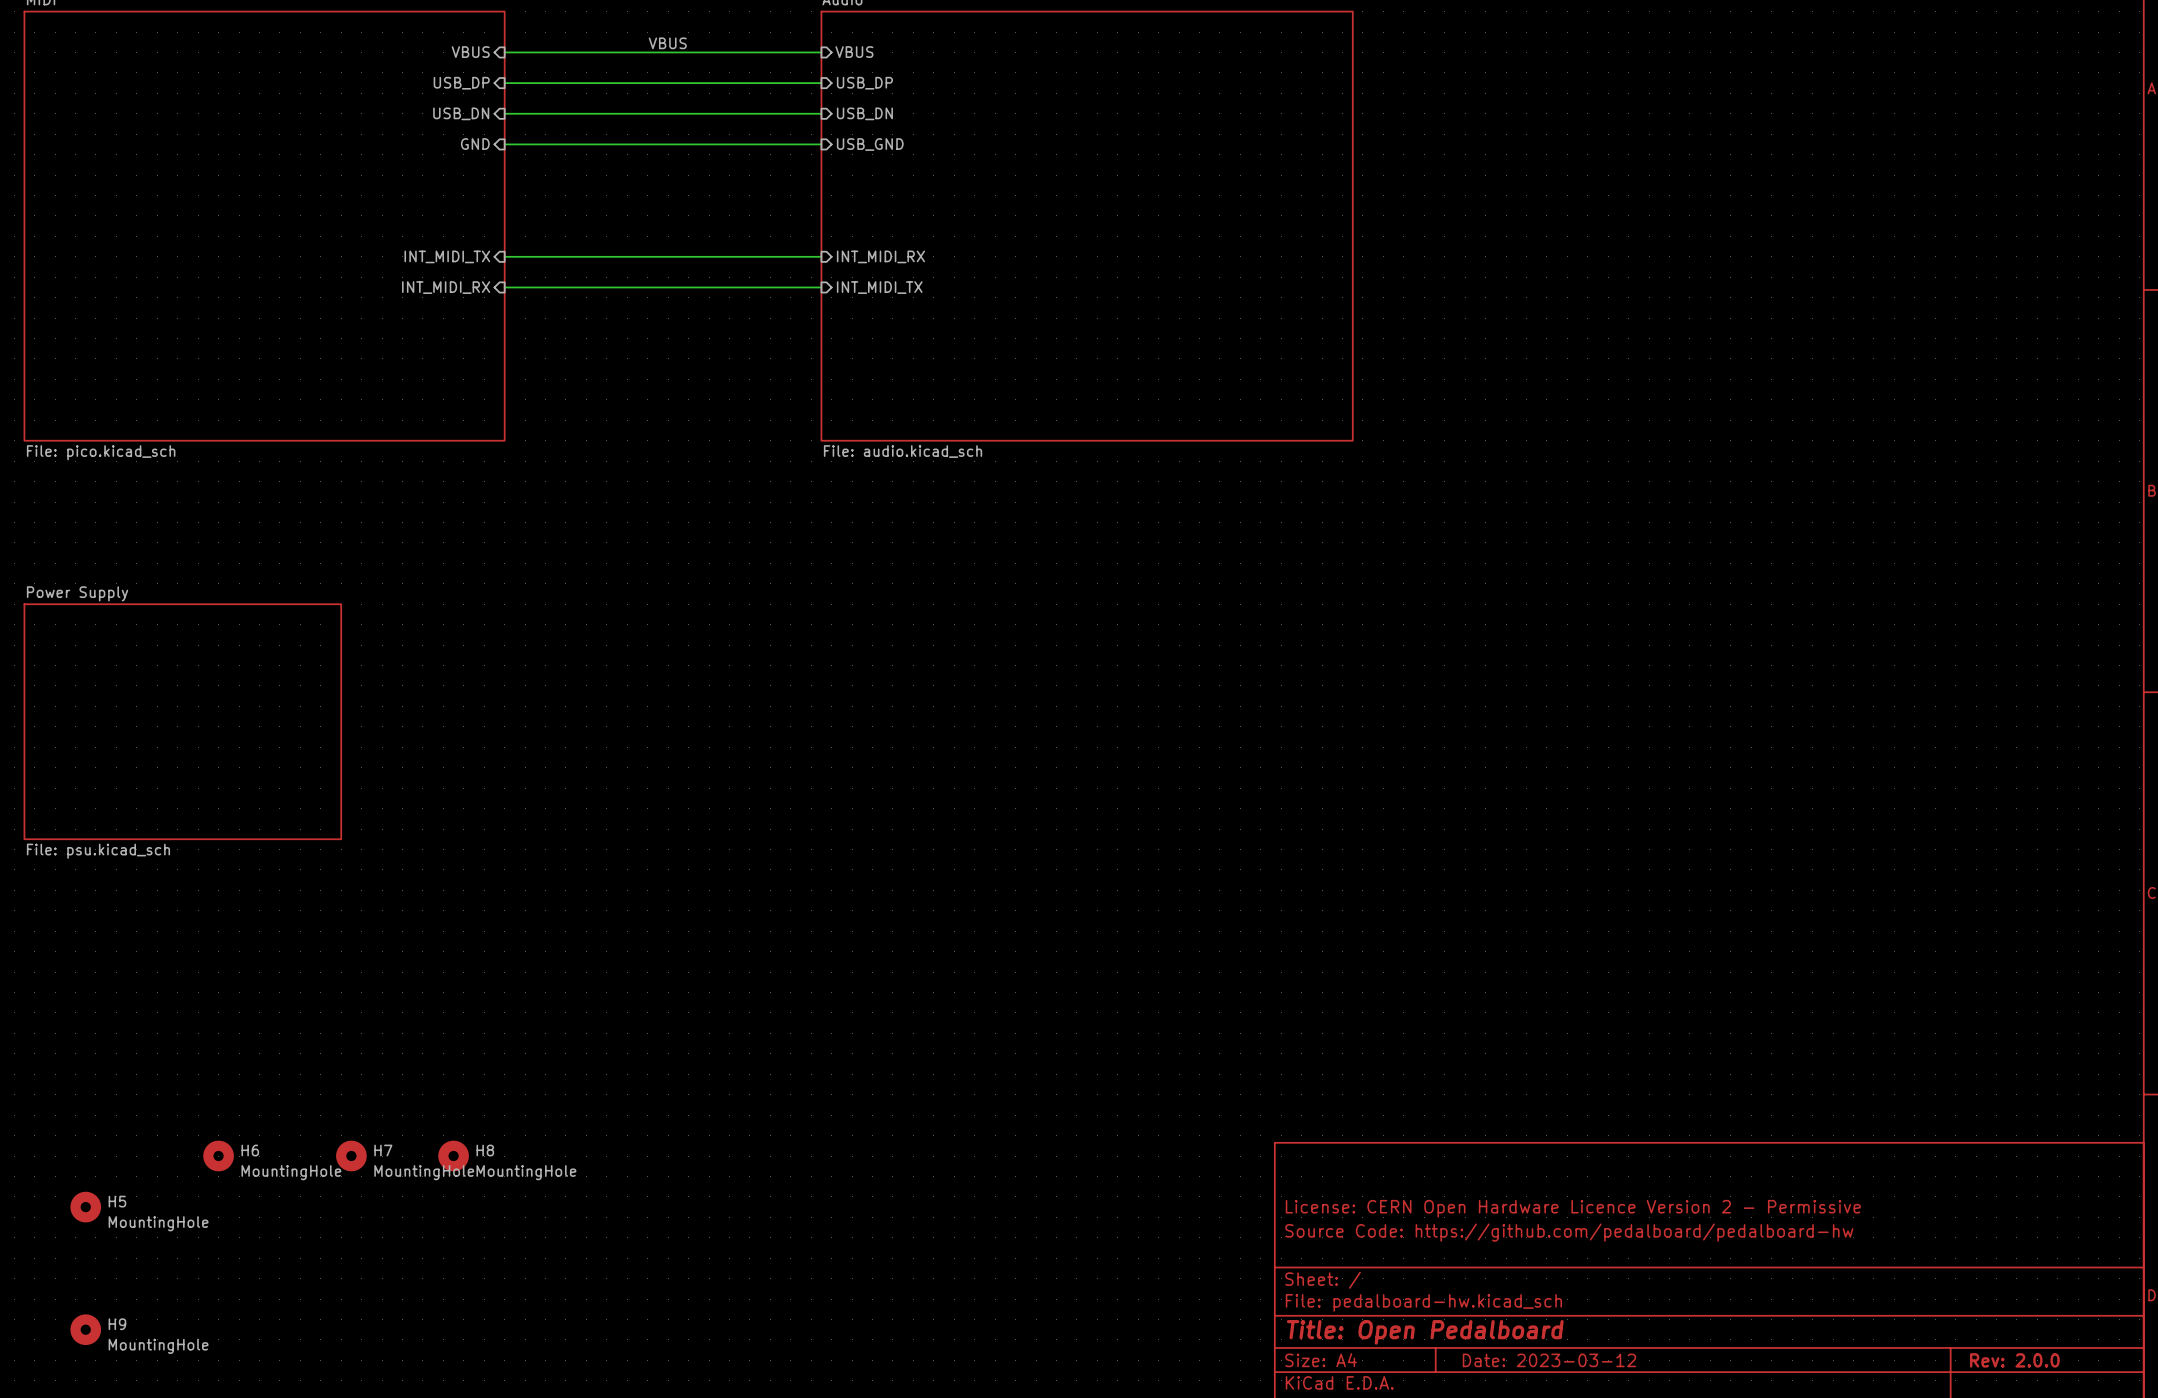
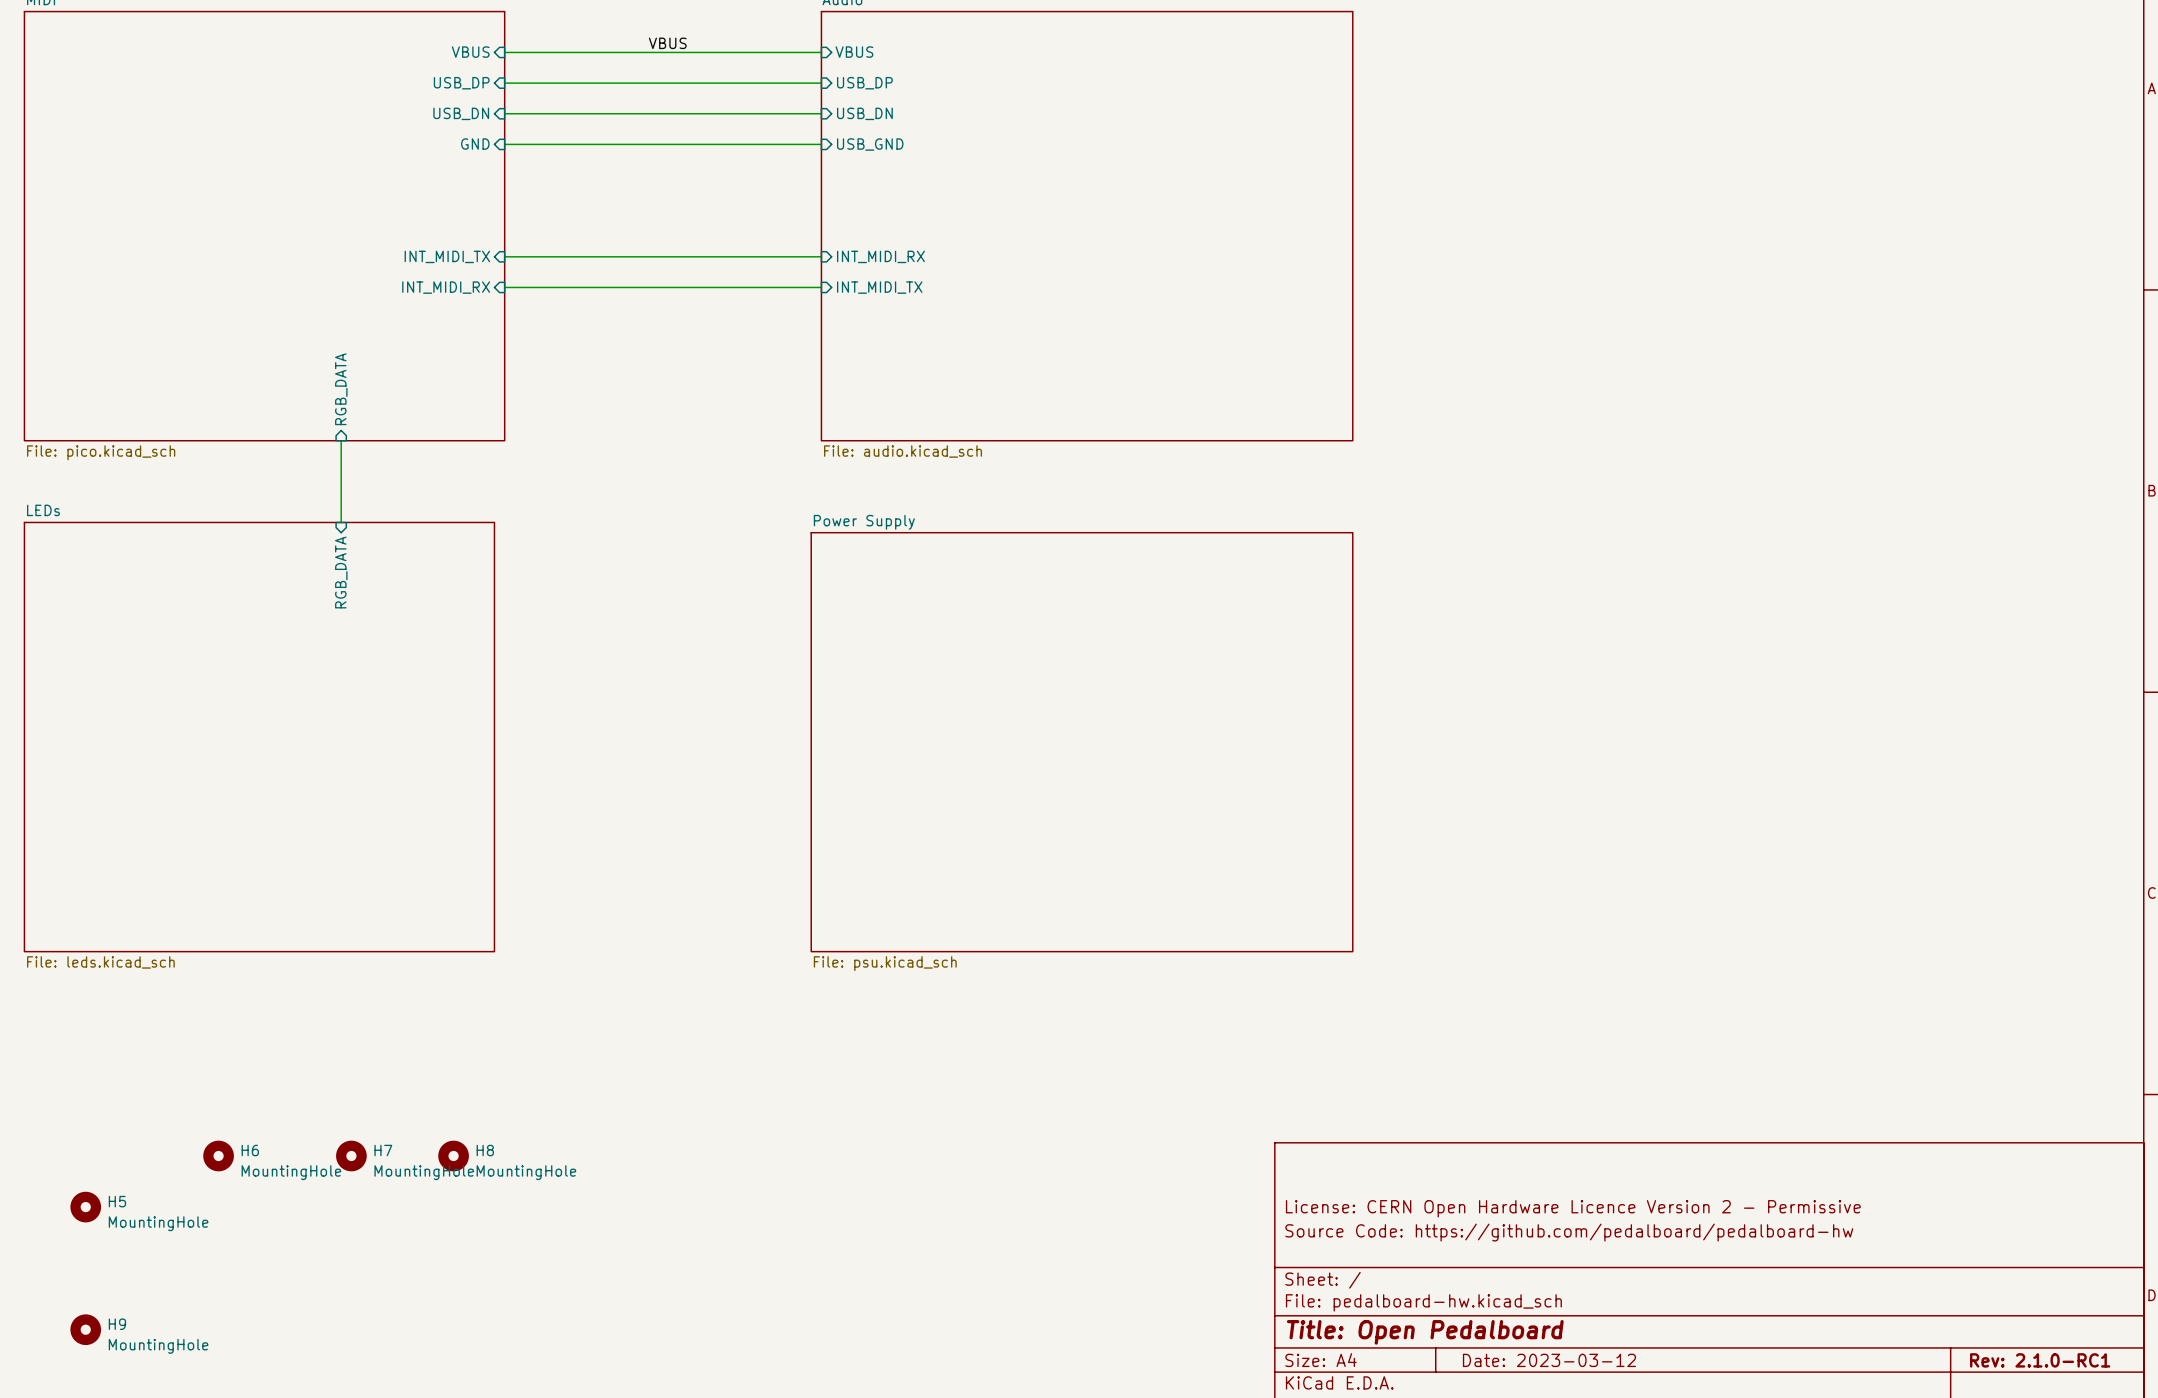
sheet pin: none -> RGB_DATA (341, 389)
wire: none -> (341, 440) (341, 522)
sheet pin: none -> RGB_DATA (341, 572)
sheet Power Supply: File: psu.kicad_sch (182, 721) -> none
sheet LEDs: none -> File: leds.kicad_sch (259, 737)
sheet Power Supply: none -> File: psu.kicad_sch (1082, 742)
title block: Rev: 2.0.0 (2014, 1360) -> Rev: 2.1.0-RC1 (2040, 1360)

